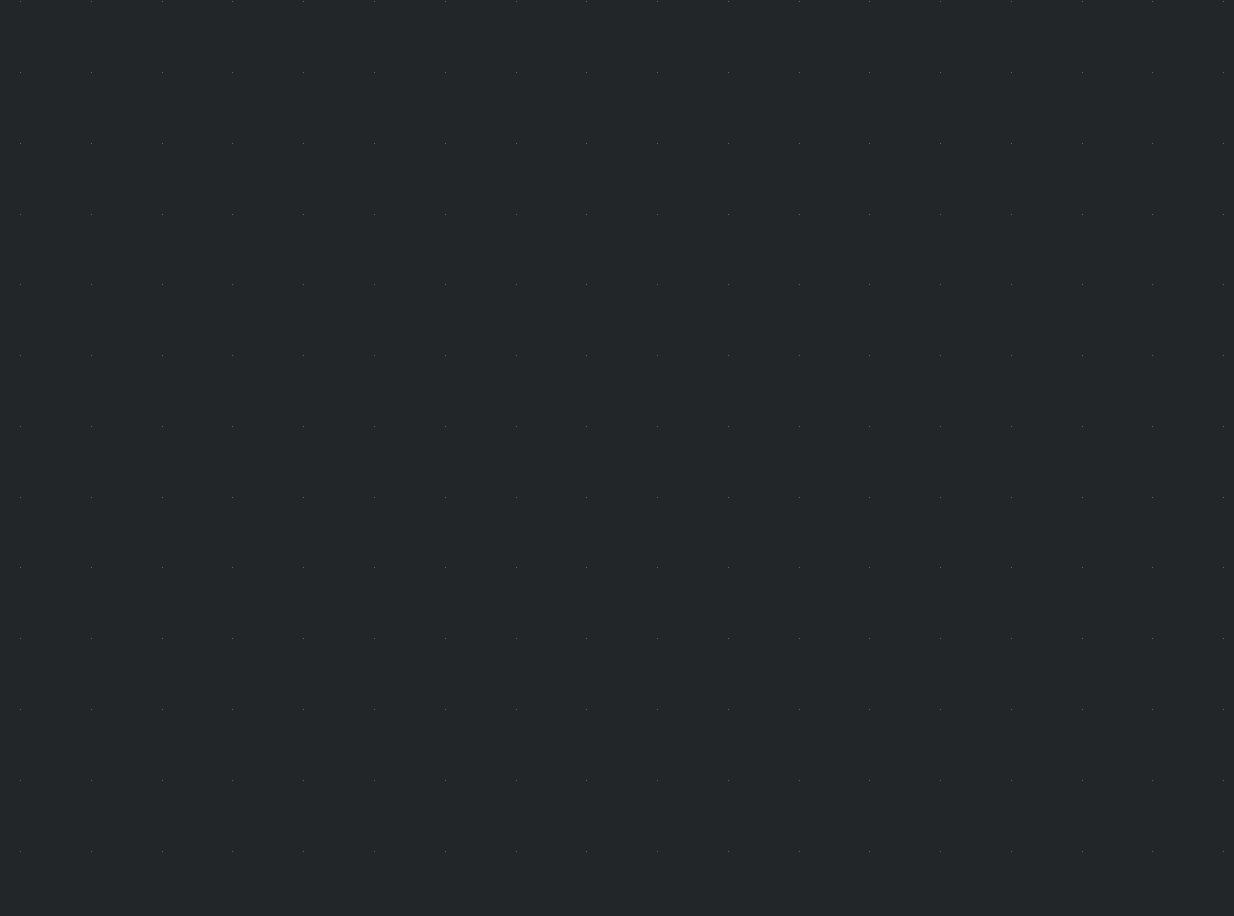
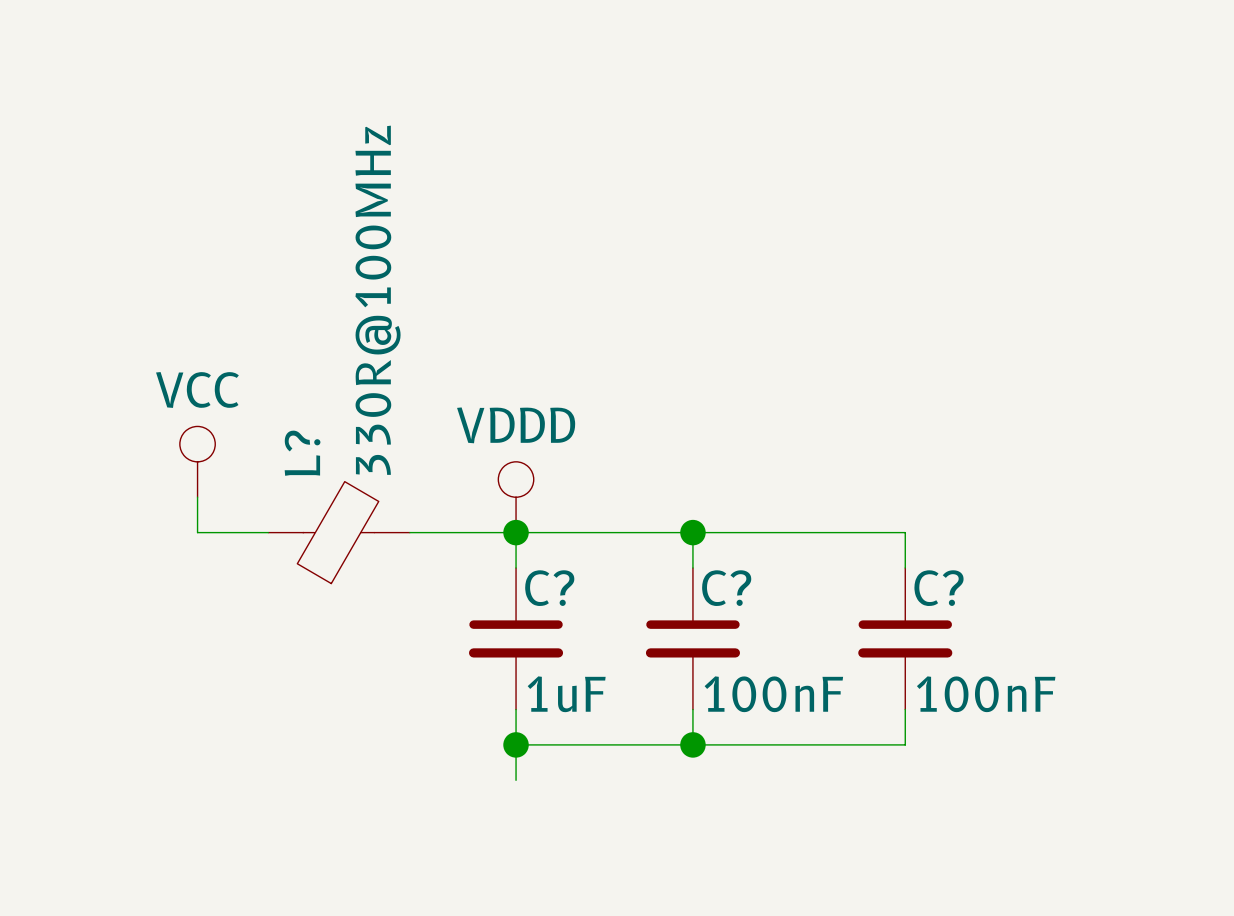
power symbol: none -> VCC (197, 461)
wire: none -> (197, 497) (197, 532) (268, 532)
power symbol: none -> VDDD (516, 497)
L?: none -> 330R@100MHz (339, 532)
wire: none -> (409, 532) (905, 532) (905, 567)
wire: none -> (516, 532) (516, 567)
junction: none -> (516, 532)
wire: none -> (692, 532) (692, 567)
junction: none -> (692, 532)
C?: none -> 1uF (516, 638)
C?: none -> 100nF (692, 638)
C?: none -> 100nF (905, 638)
wire: none -> (516, 709) (516, 780)
wire: none -> (692, 709) (692, 744)
wire: none -> (905, 709) (905, 744) (516, 744)
junction: none -> (516, 744)
junction: none -> (692, 744)

